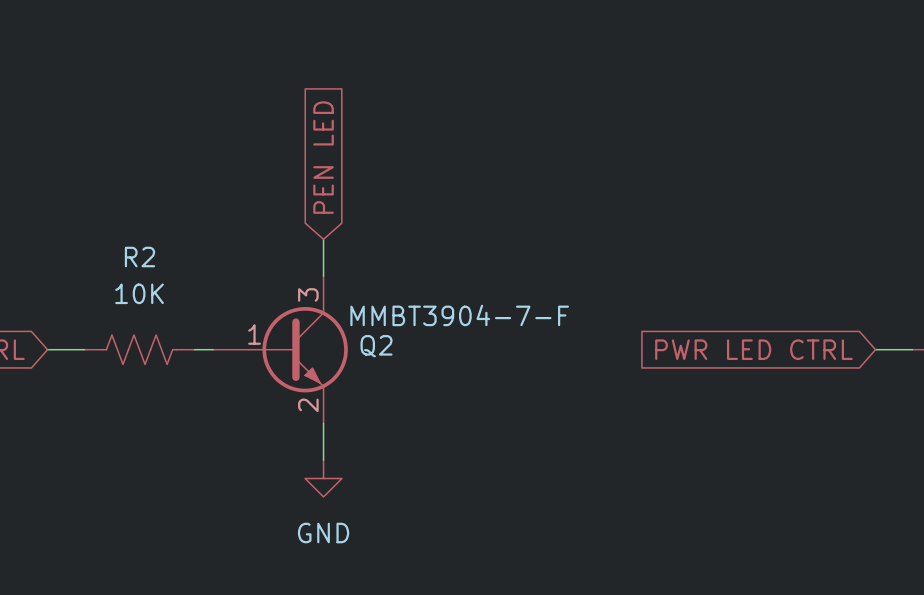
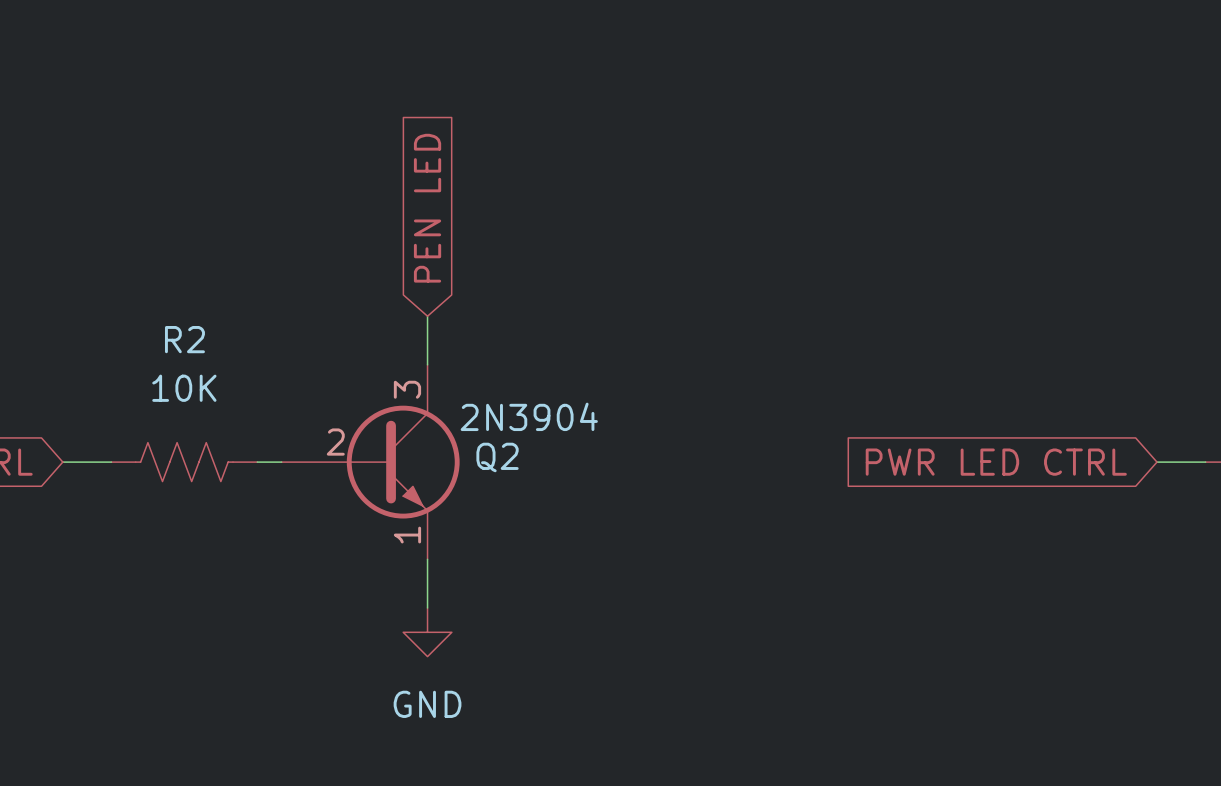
Q2 value: MMBT3904-7-F (459, 315) -> 2N3904 (529, 416)
Q2 pin number: 1 (254, 334) -> 2 (335, 442)
Q2 pin number: 2 (308, 405) -> 1 (407, 535)

